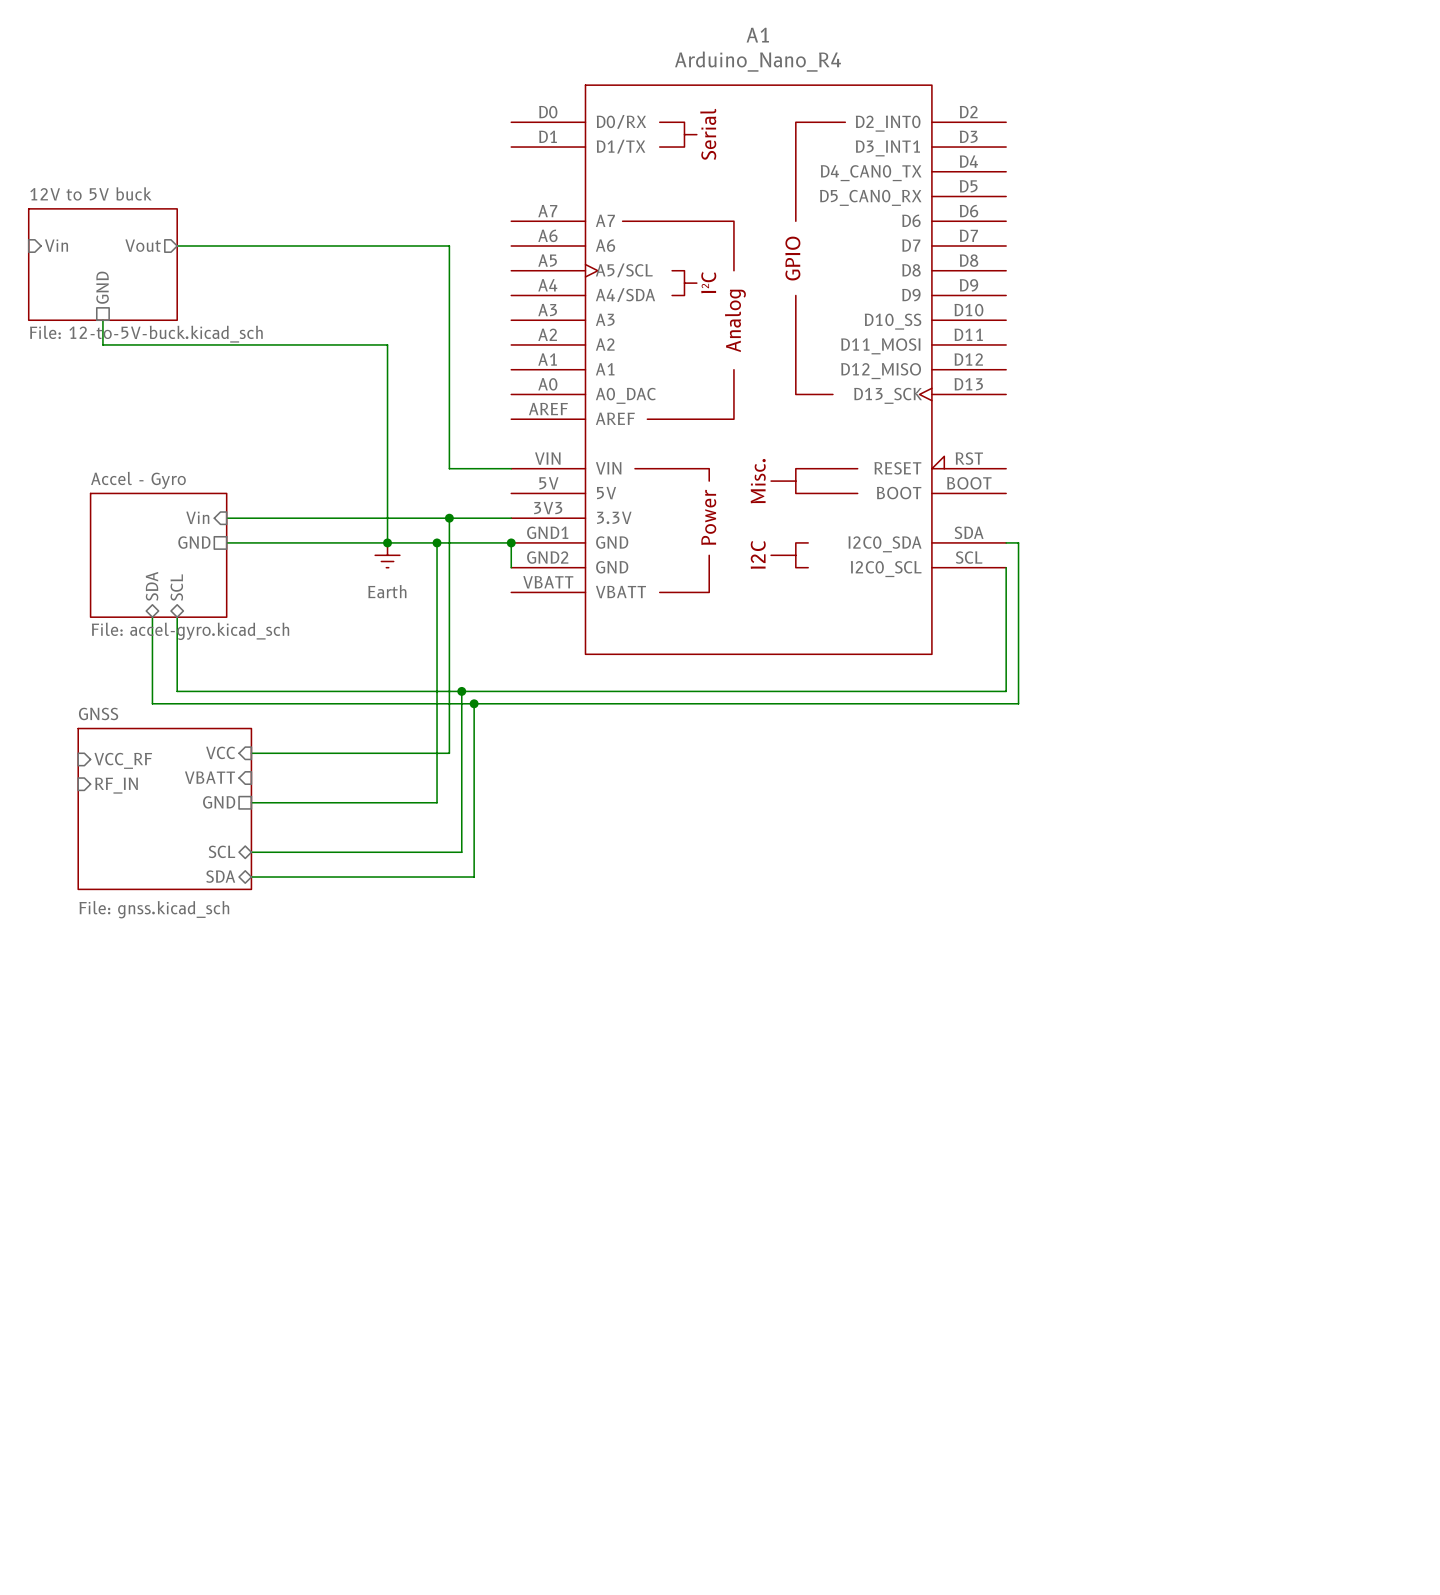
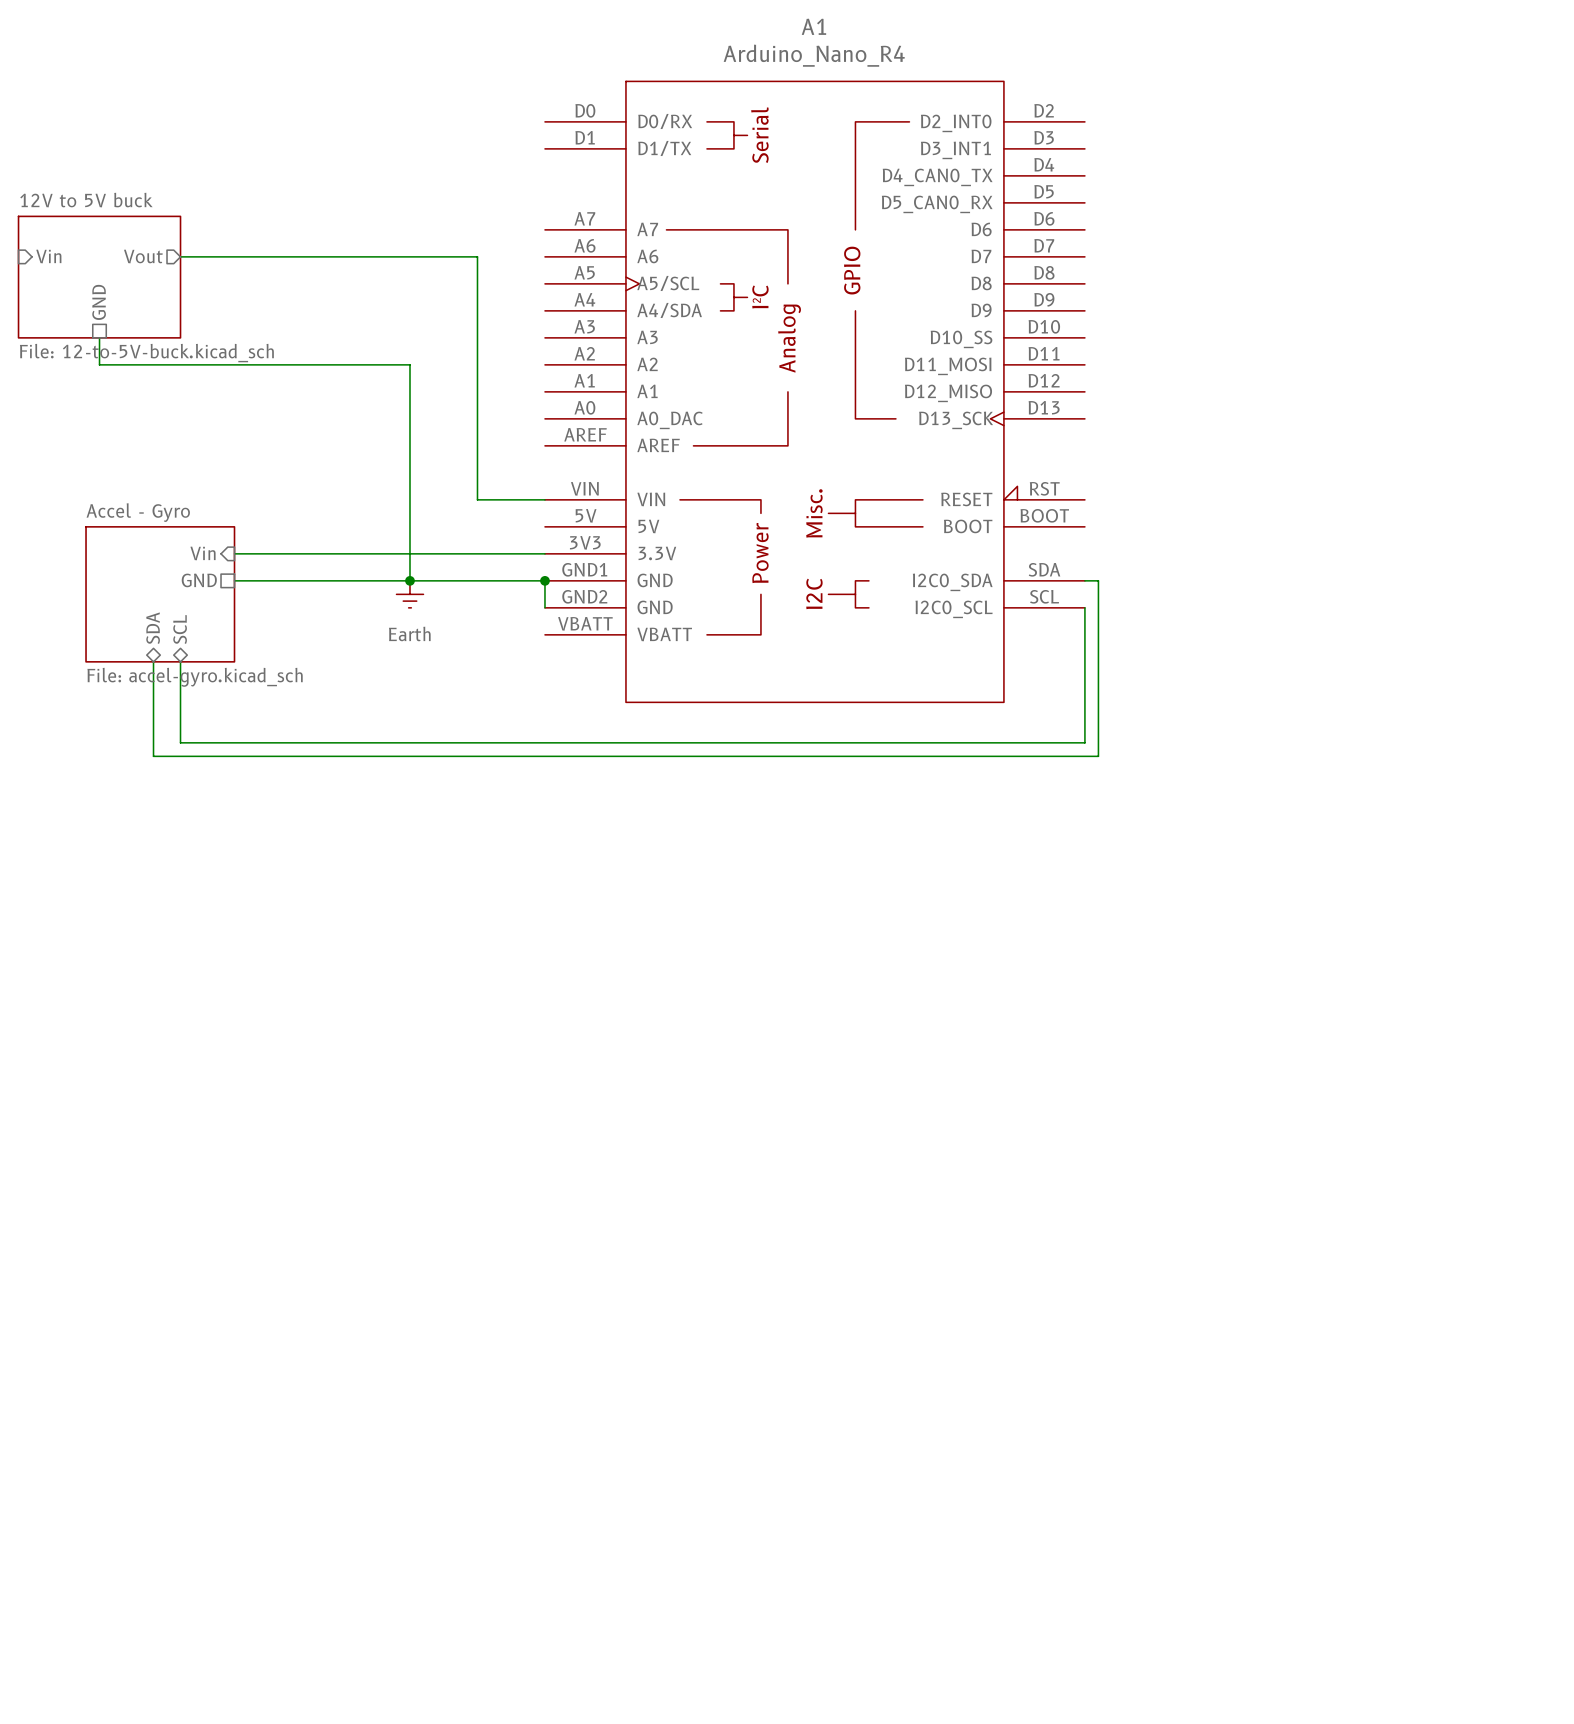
wire: (449, 518) (449, 753) (251, 753) -> none
junction: (449, 518) -> none
wire: (437, 542) (437, 802) (251, 802) -> none
junction: (437, 542) -> none
wire: (461, 691) (461, 852) (251, 852) -> none
junction: (461, 691) -> none
wire: (474, 703) (474, 877) (251, 877) -> none
junction: (474, 703) -> none
sheet pin: VCC (220, 752) -> none
sheet pin: VCC_RF (123, 760) -> none
sheet pin: VBATT (210, 777) -> none
sheet pin: RF_IN (116, 785) -> none
sheet pin: GND (219, 802) -> none
sheet GNSS: File: gnss.kicad_sch (164, 808) -> none
sheet pin: SCL (221, 851) -> none
sheet pin: SDA (220, 876) -> none

